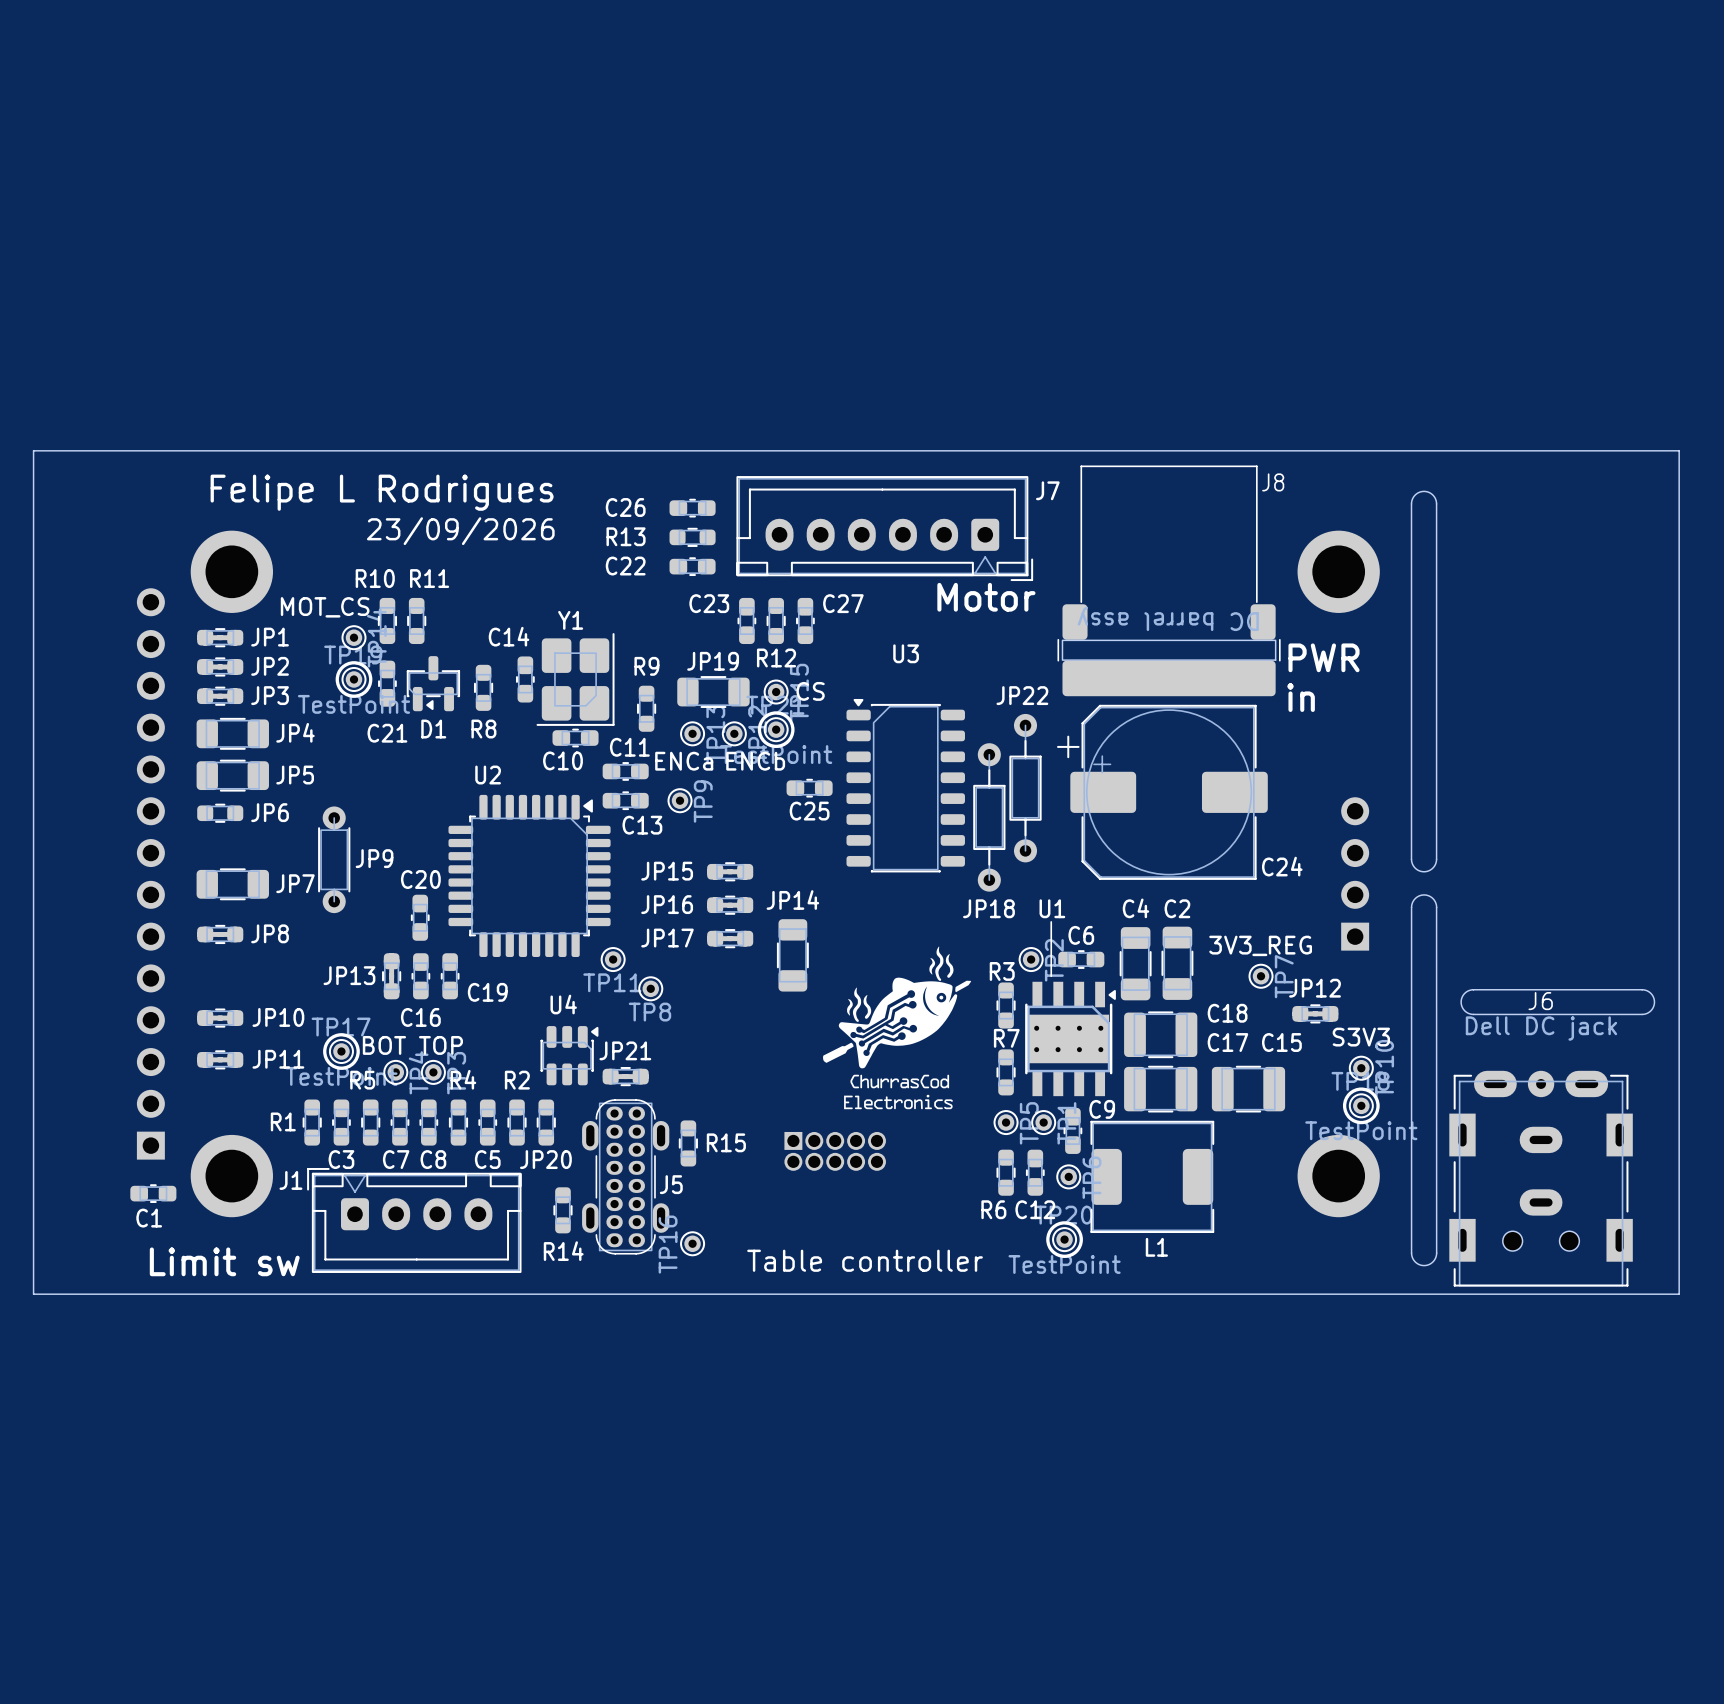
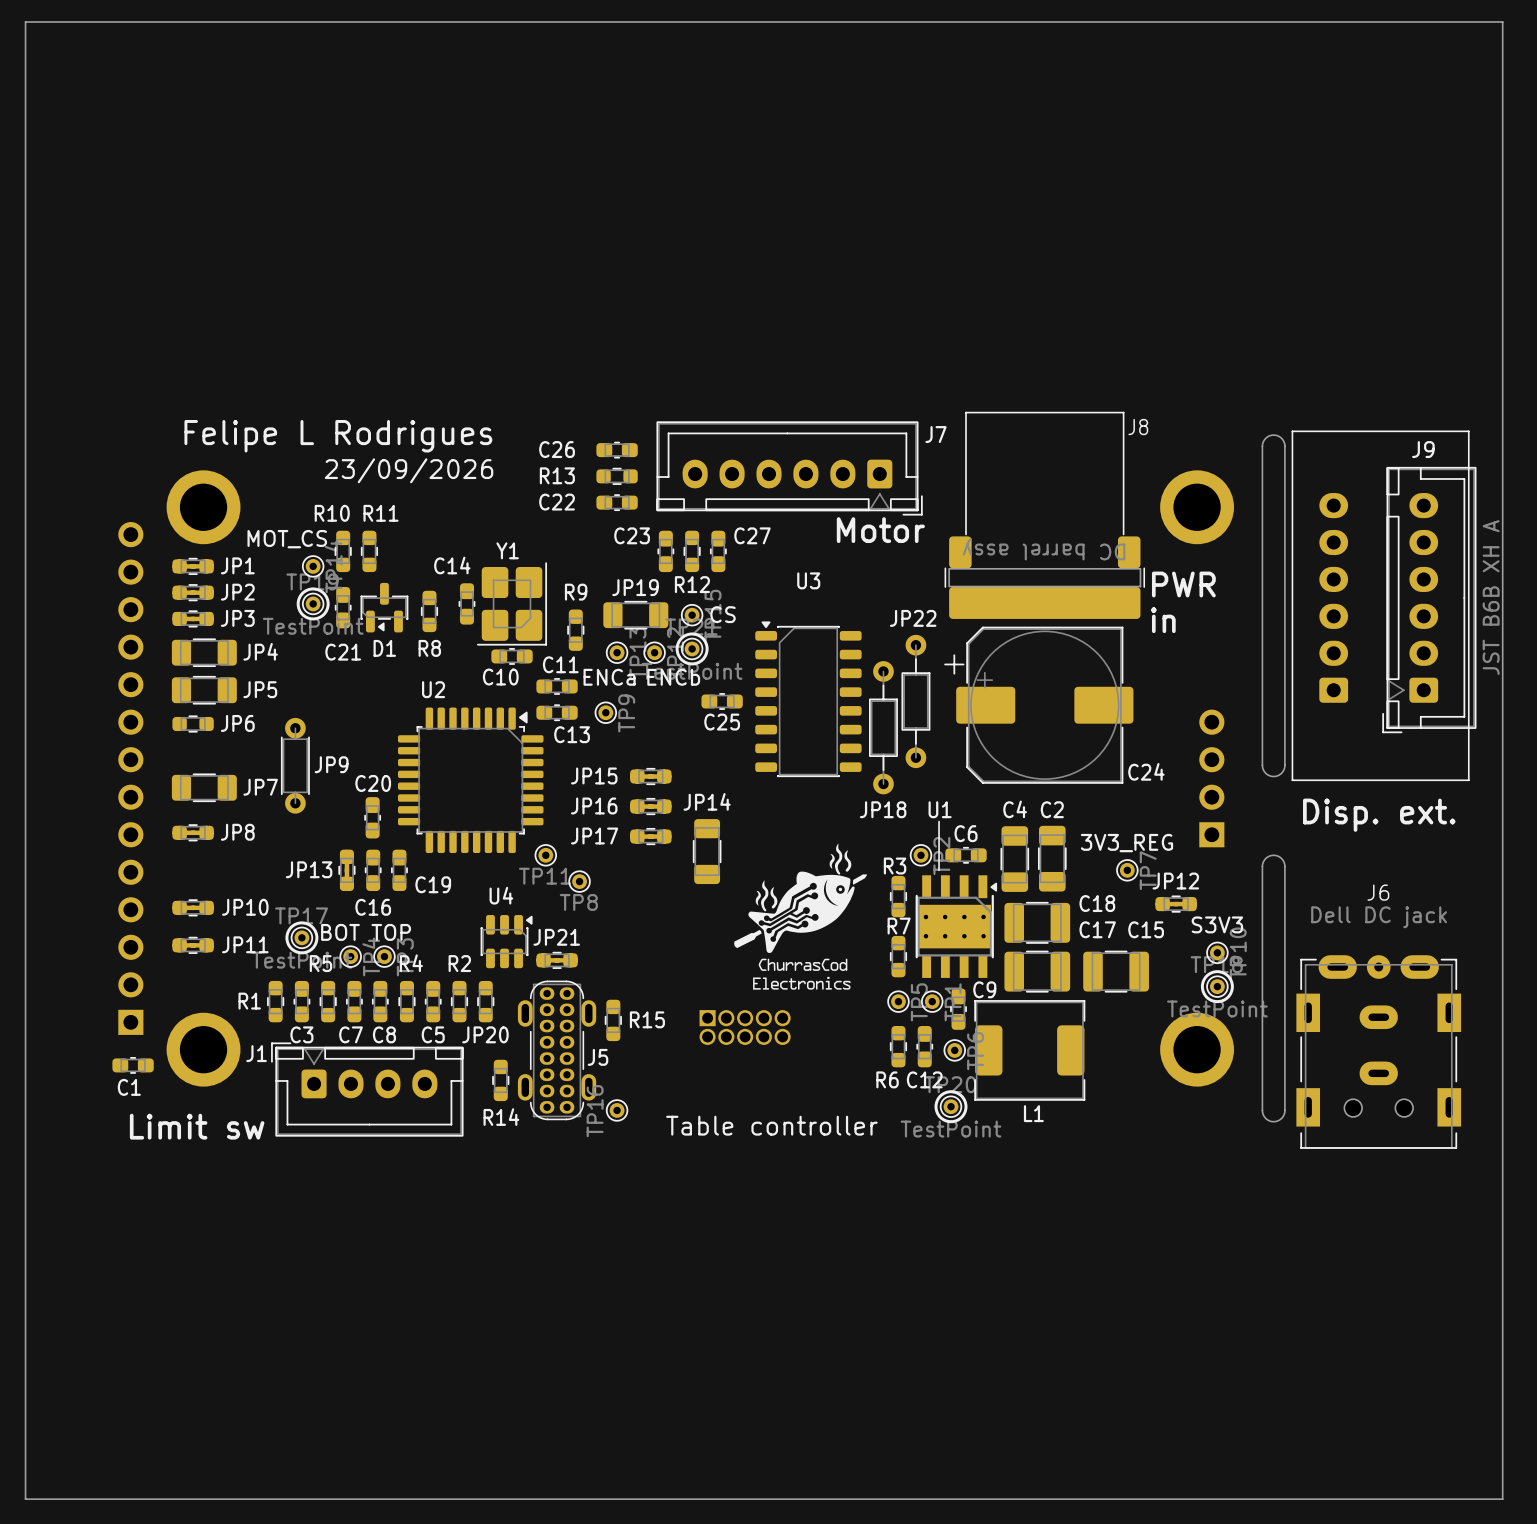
board edge: (33, 450) (1679, 450) -> (25, 398) (25, 21) (1502, 21) (1502, 398)
line: none -> (1292, 431) (1468, 431) (1468, 780) (1292, 780) (1292, 431)
part: none -> (1333, 597)
J9: none -> JST B6B XH A (1429, 600)
board edge: (1411, 907) (1411, 1253) (1414, 1261) (1424, 1265) (1433, 1261) (1436, 1253) (1436, 905) (1431, 897) (1422, 895) (1414, 899) (1411, 907) -> (1262, 866) (1262, 1110) (1265, 1118) (1273, 1121) (1281, 1118) (1284, 1110) (1284, 866) (1281, 858) (1273, 855) (1265, 859) (1262, 866)
text: none -> Disp. ext. (1379, 815)
board edge: (1473, 989) (1643, 989) (1651, 994) (1654, 1003) (1650, 1010) (1642, 1014) (1471, 1014) (1464, 1010) (1461, 1002) (1464, 993) (1473, 989) -> none
board edge: (33, 1294) (1679, 1294) -> (25, 1155) (25, 1499) (1502, 1499) (1502, 1155)

